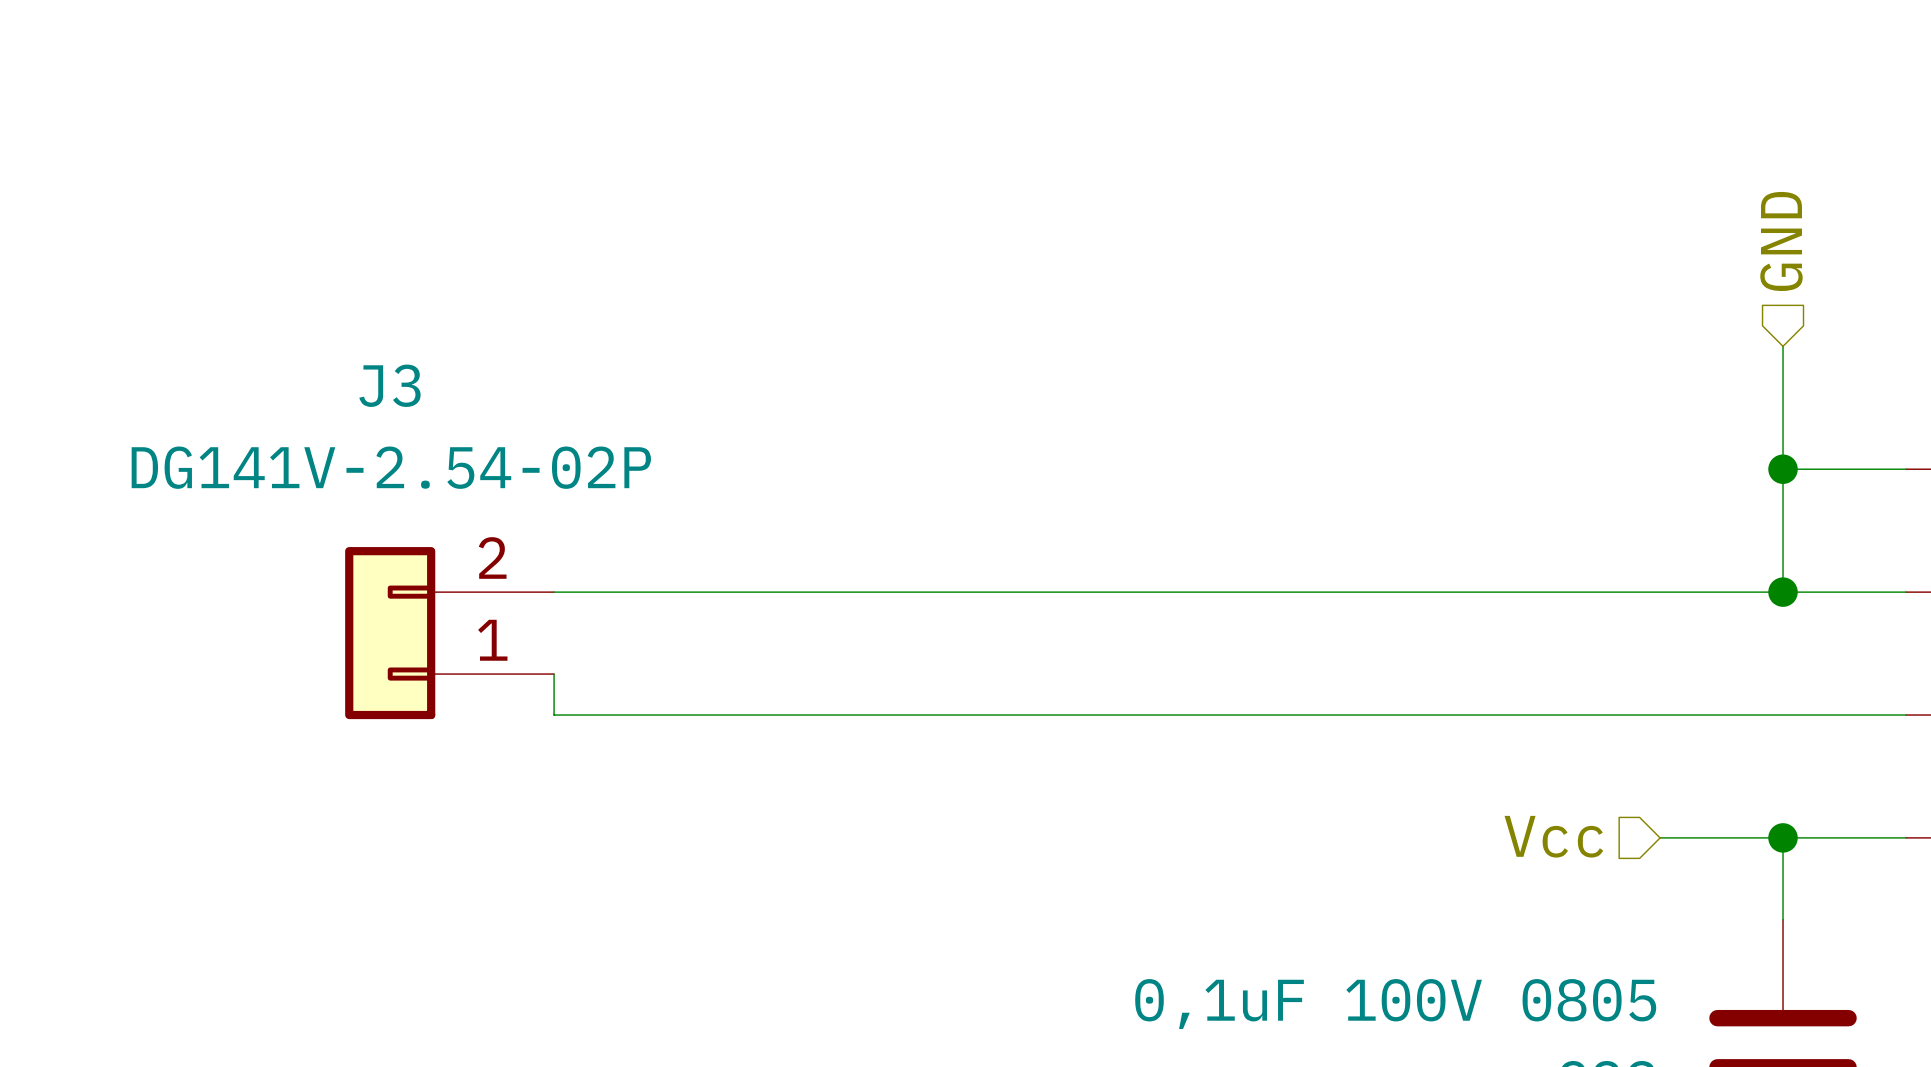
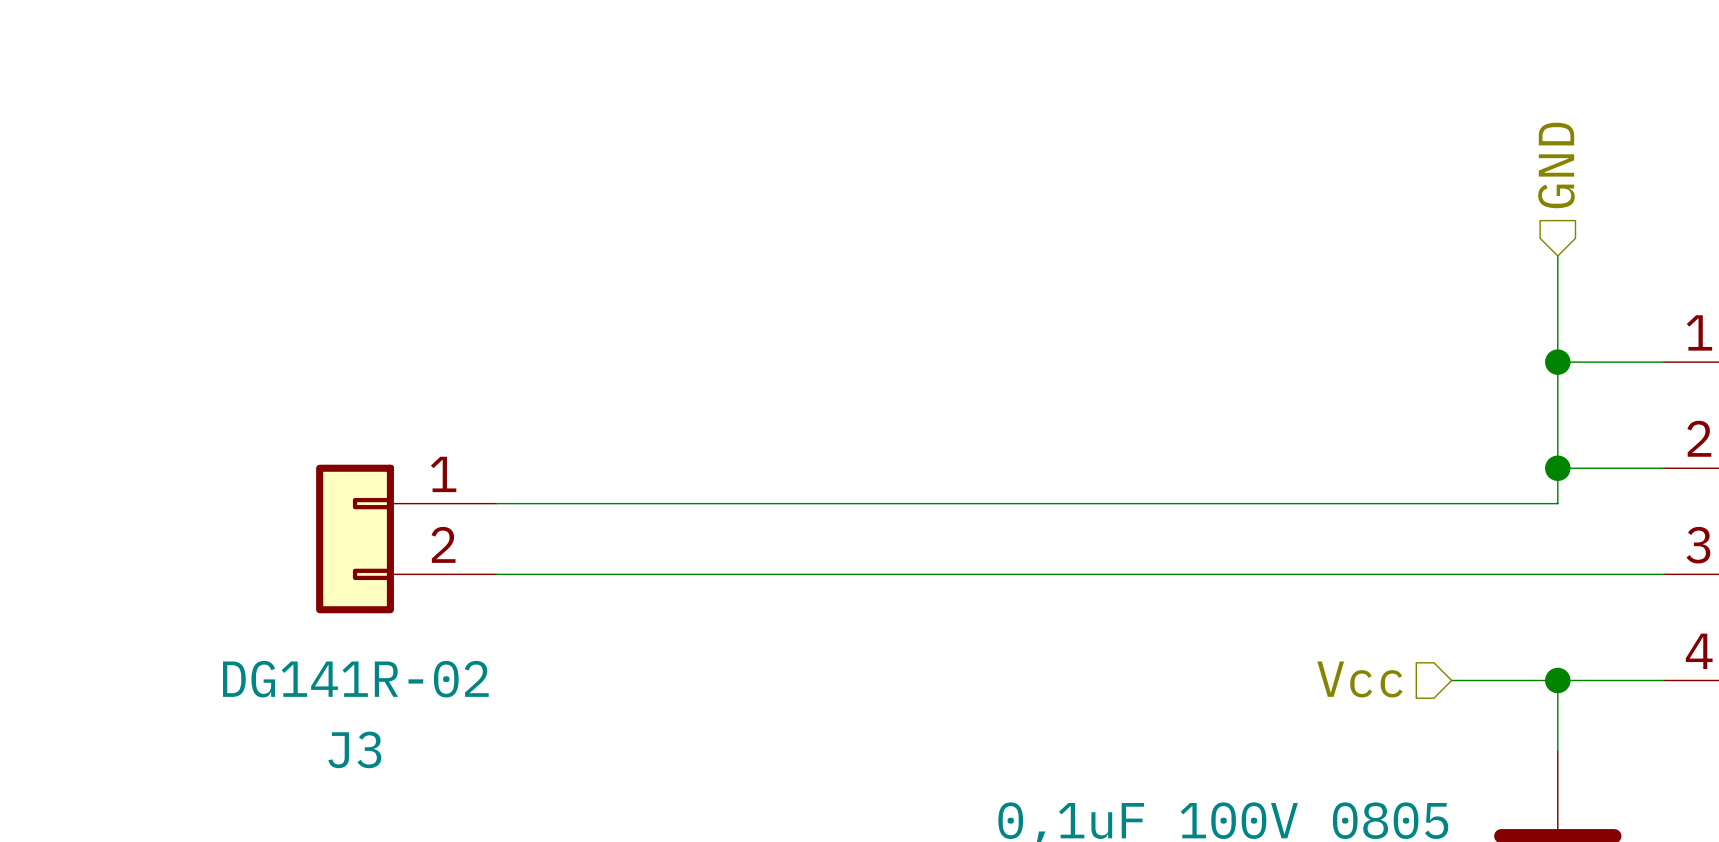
J3 value: DG141V-2.54-02P (391, 467) -> DG141R-02 (355, 679)
wire: (554, 592) (1783, 592) -> (496, 503) (1557, 503) (1557, 468)
J3 flip: as is (390, 633) -> up-down (355, 538)
wire: (554, 674) (554, 715) -> none

